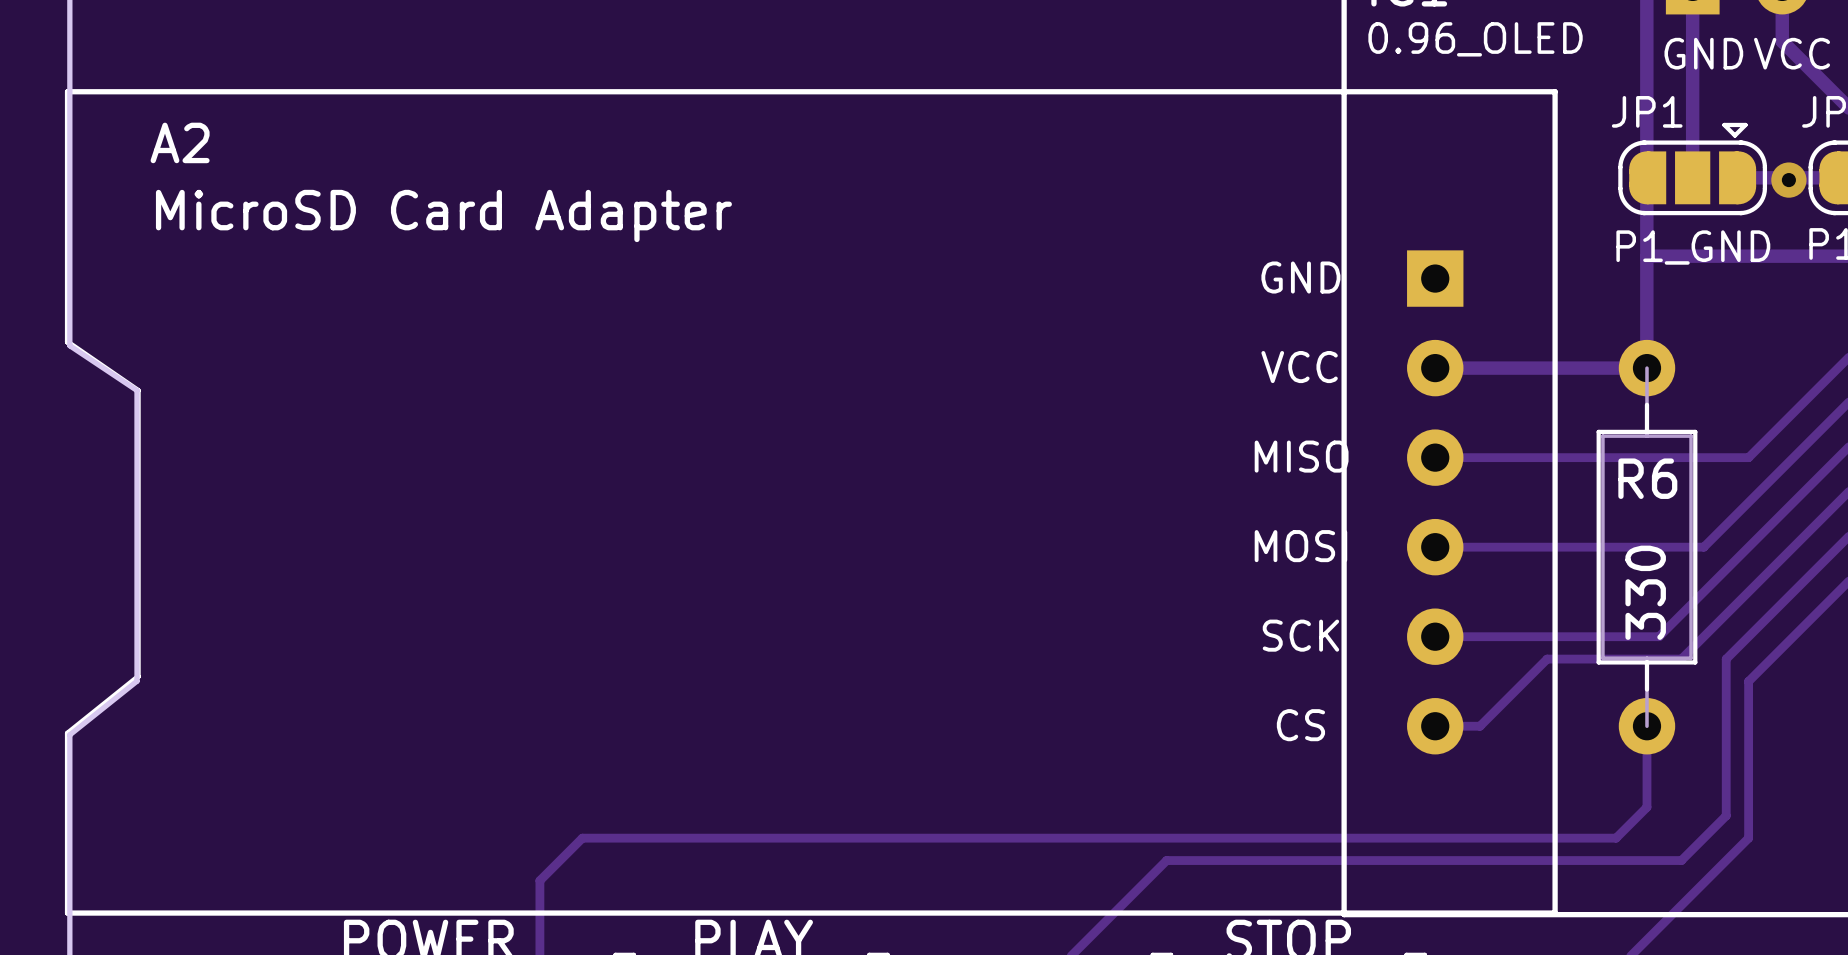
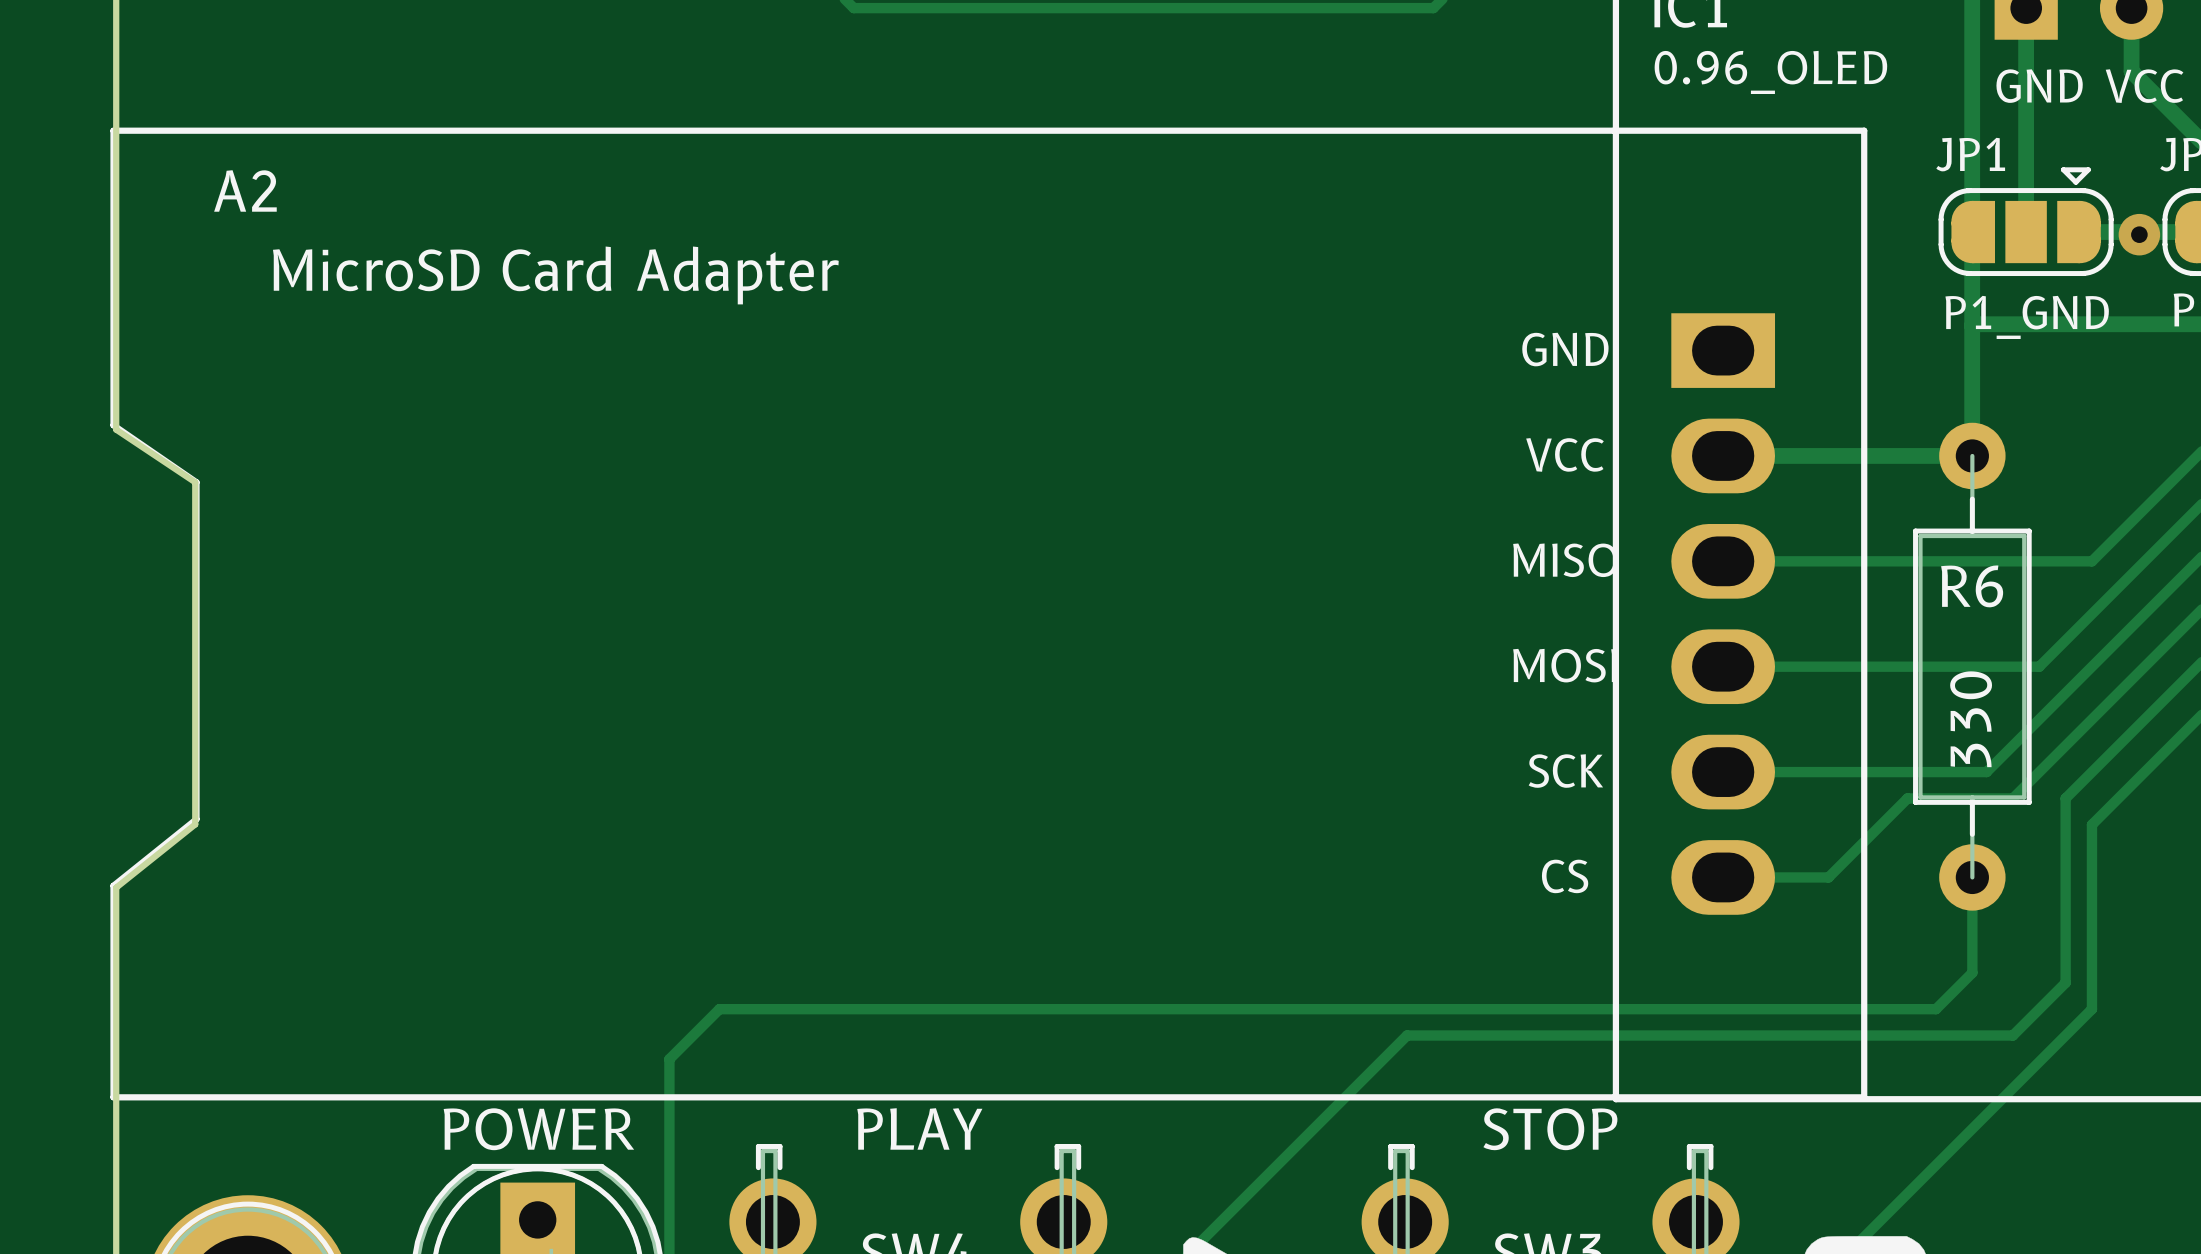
A2 footprint: [64, 89, 1558, 916] -> [110, 127, 1868, 1101]
track: (1591, 659) (1547, 659) (1480, 726) -> (1907, 798) (1828, 877) (1775, 877)

